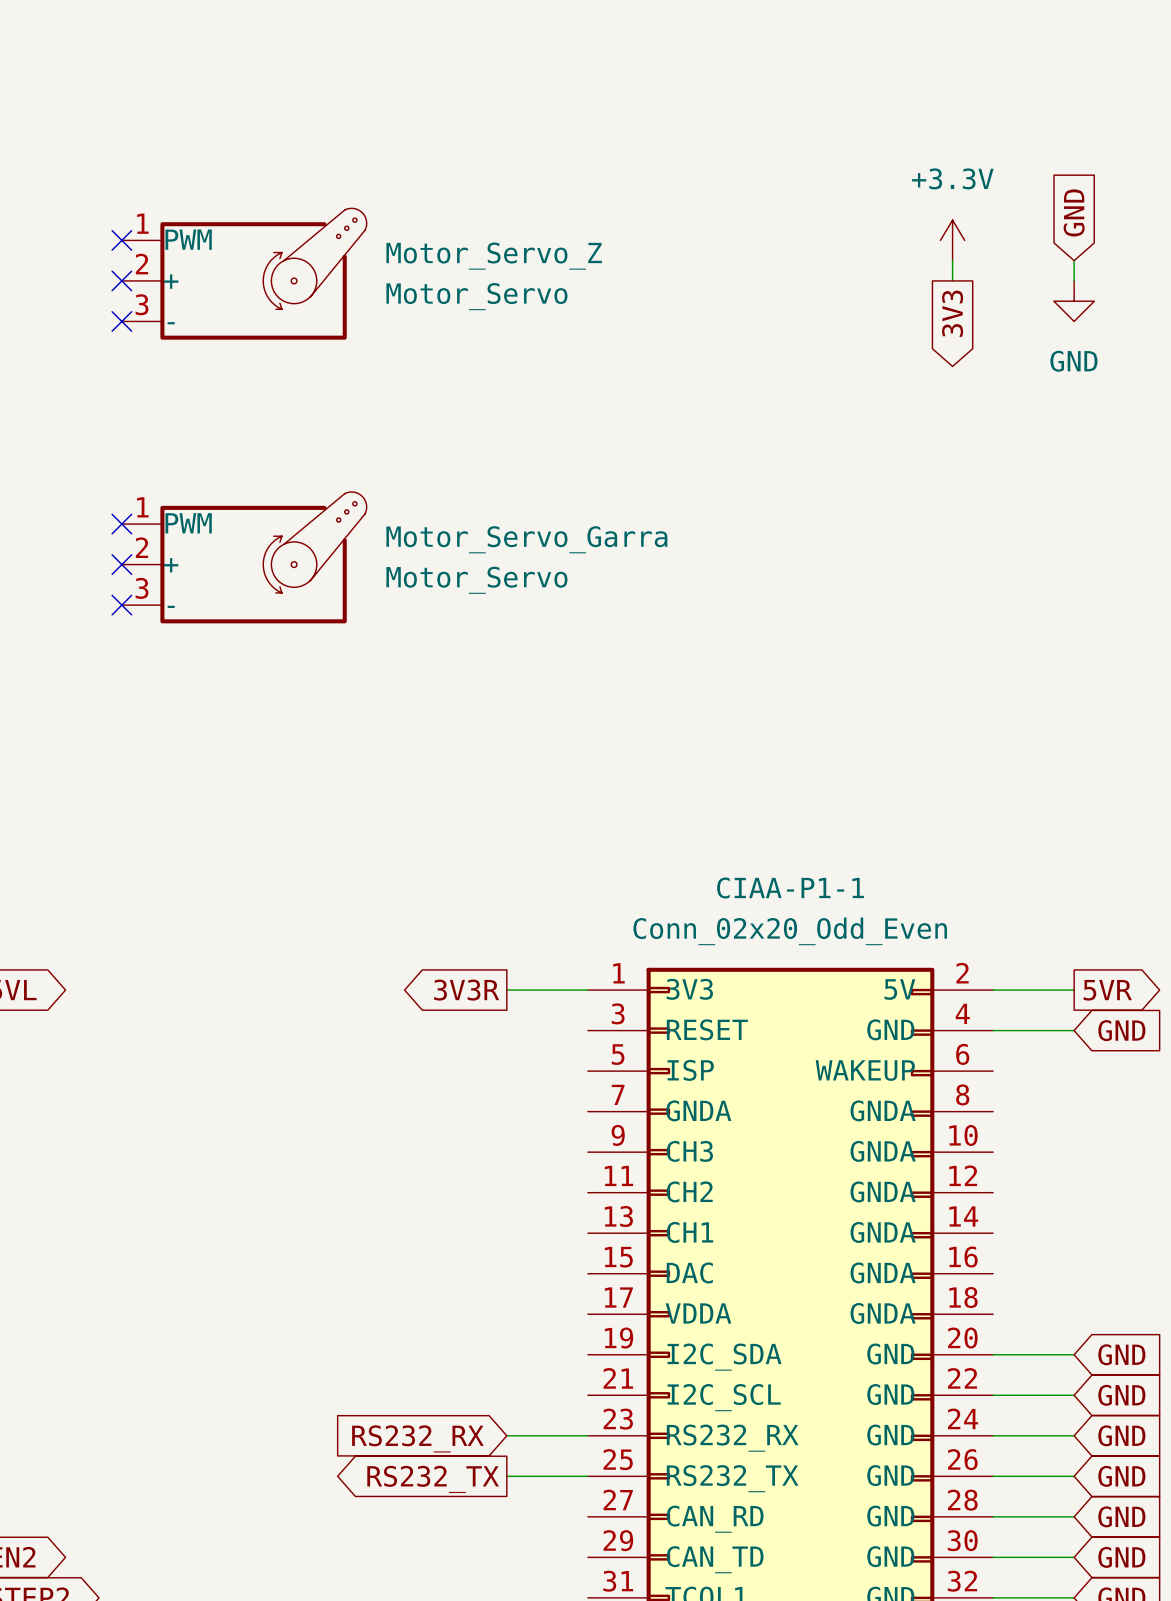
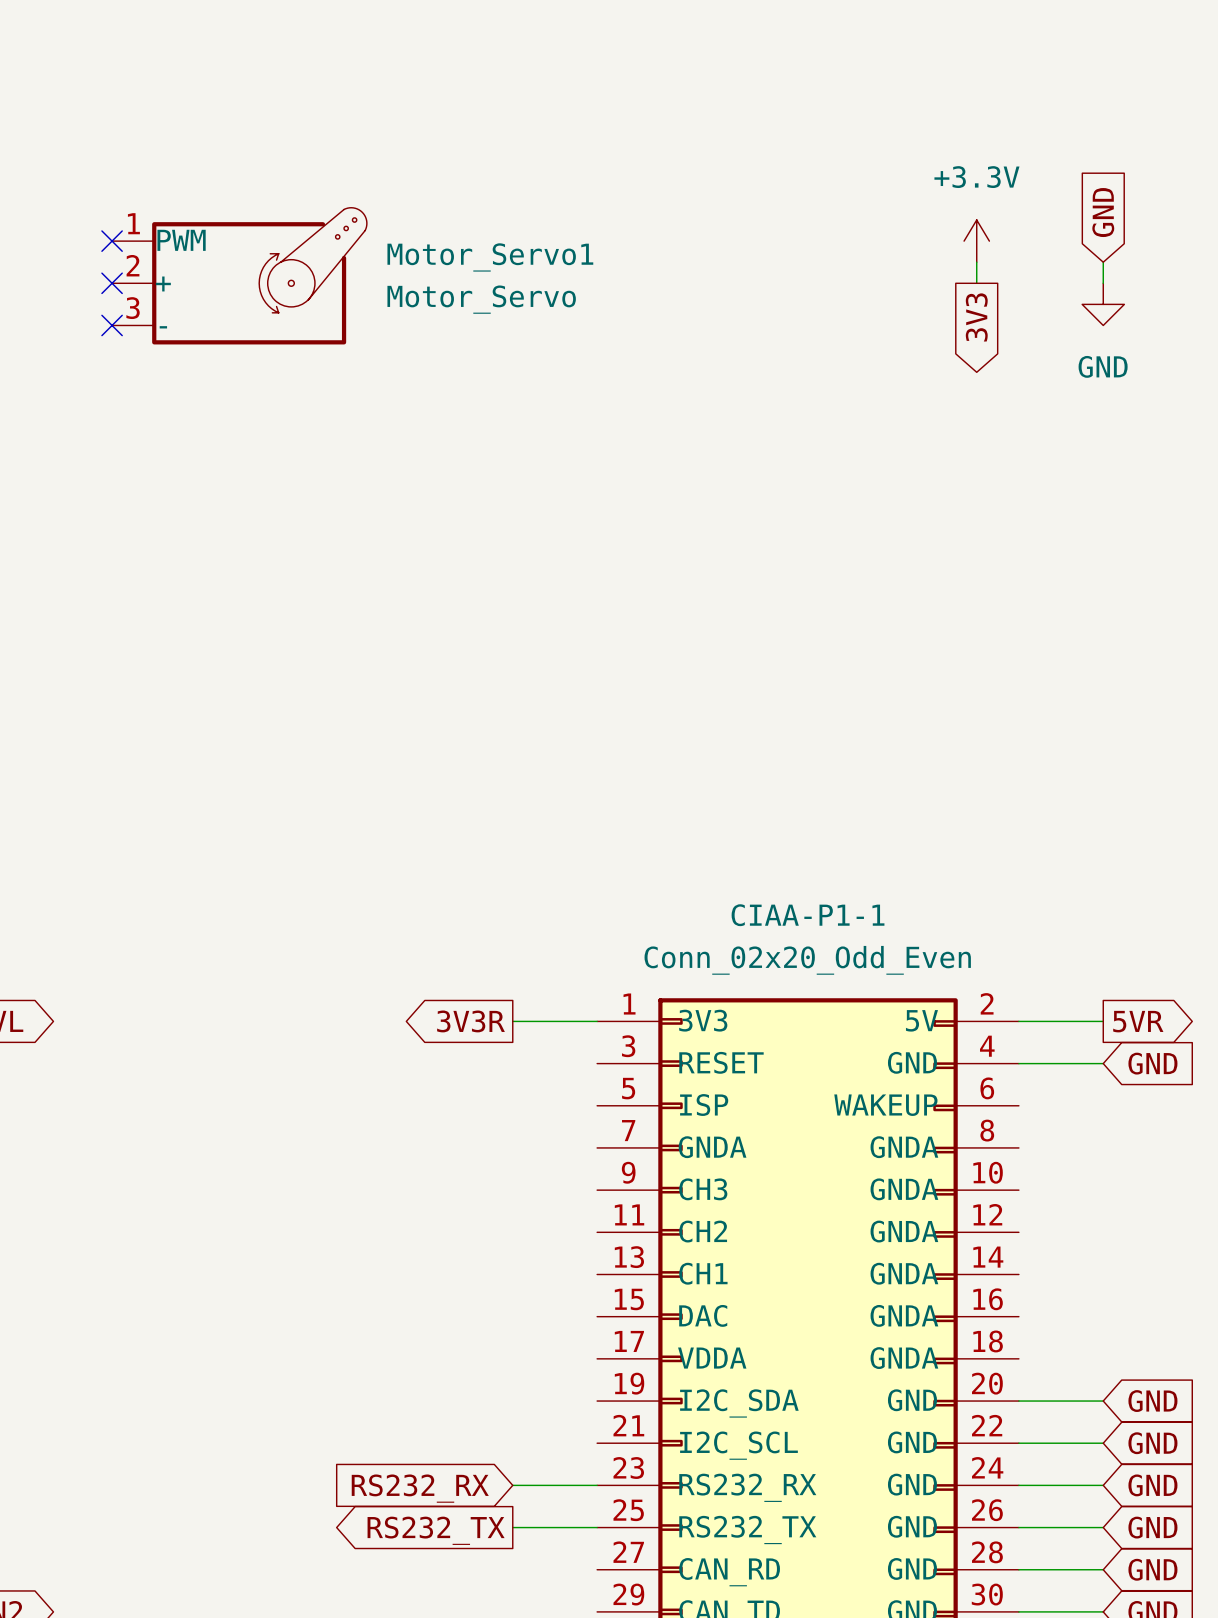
Motor_Servo_Z name: Motor_Servo_Z (494, 256) -> Motor_Servo1 (490, 257)
no-connect mark: (121, 524) -> none
Motor_Servo_Garra: Motor_Servo (244, 557) -> none
no-connect mark: (121, 564) -> none
no-connect mark: (121, 605) -> none

